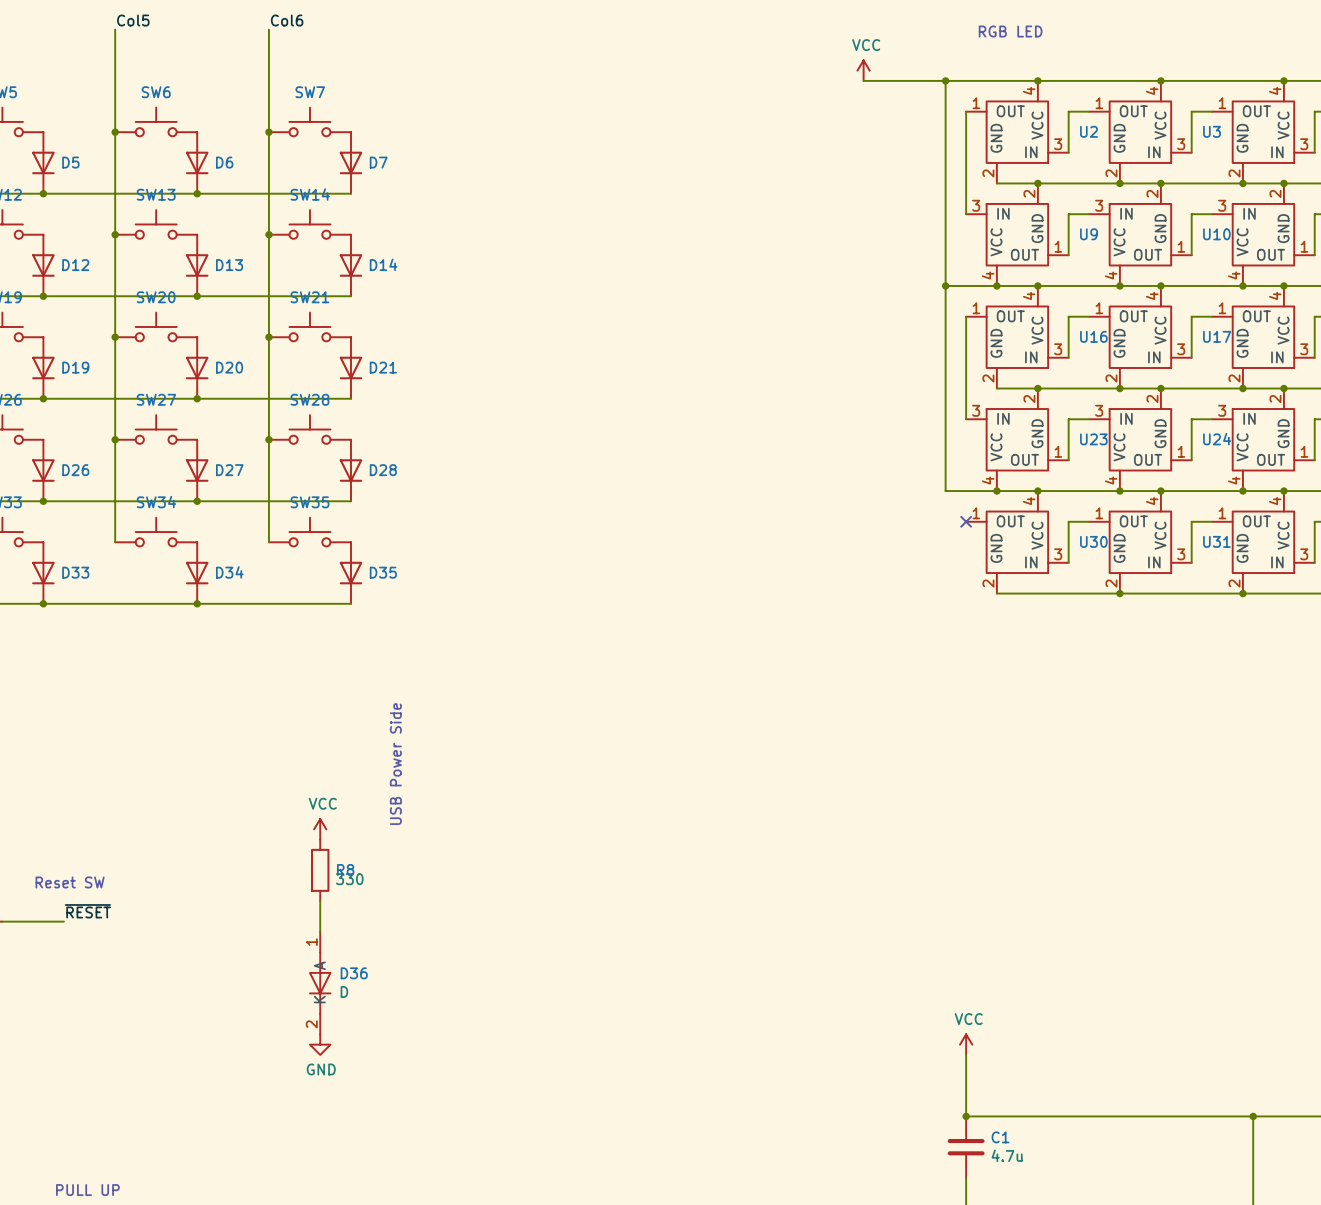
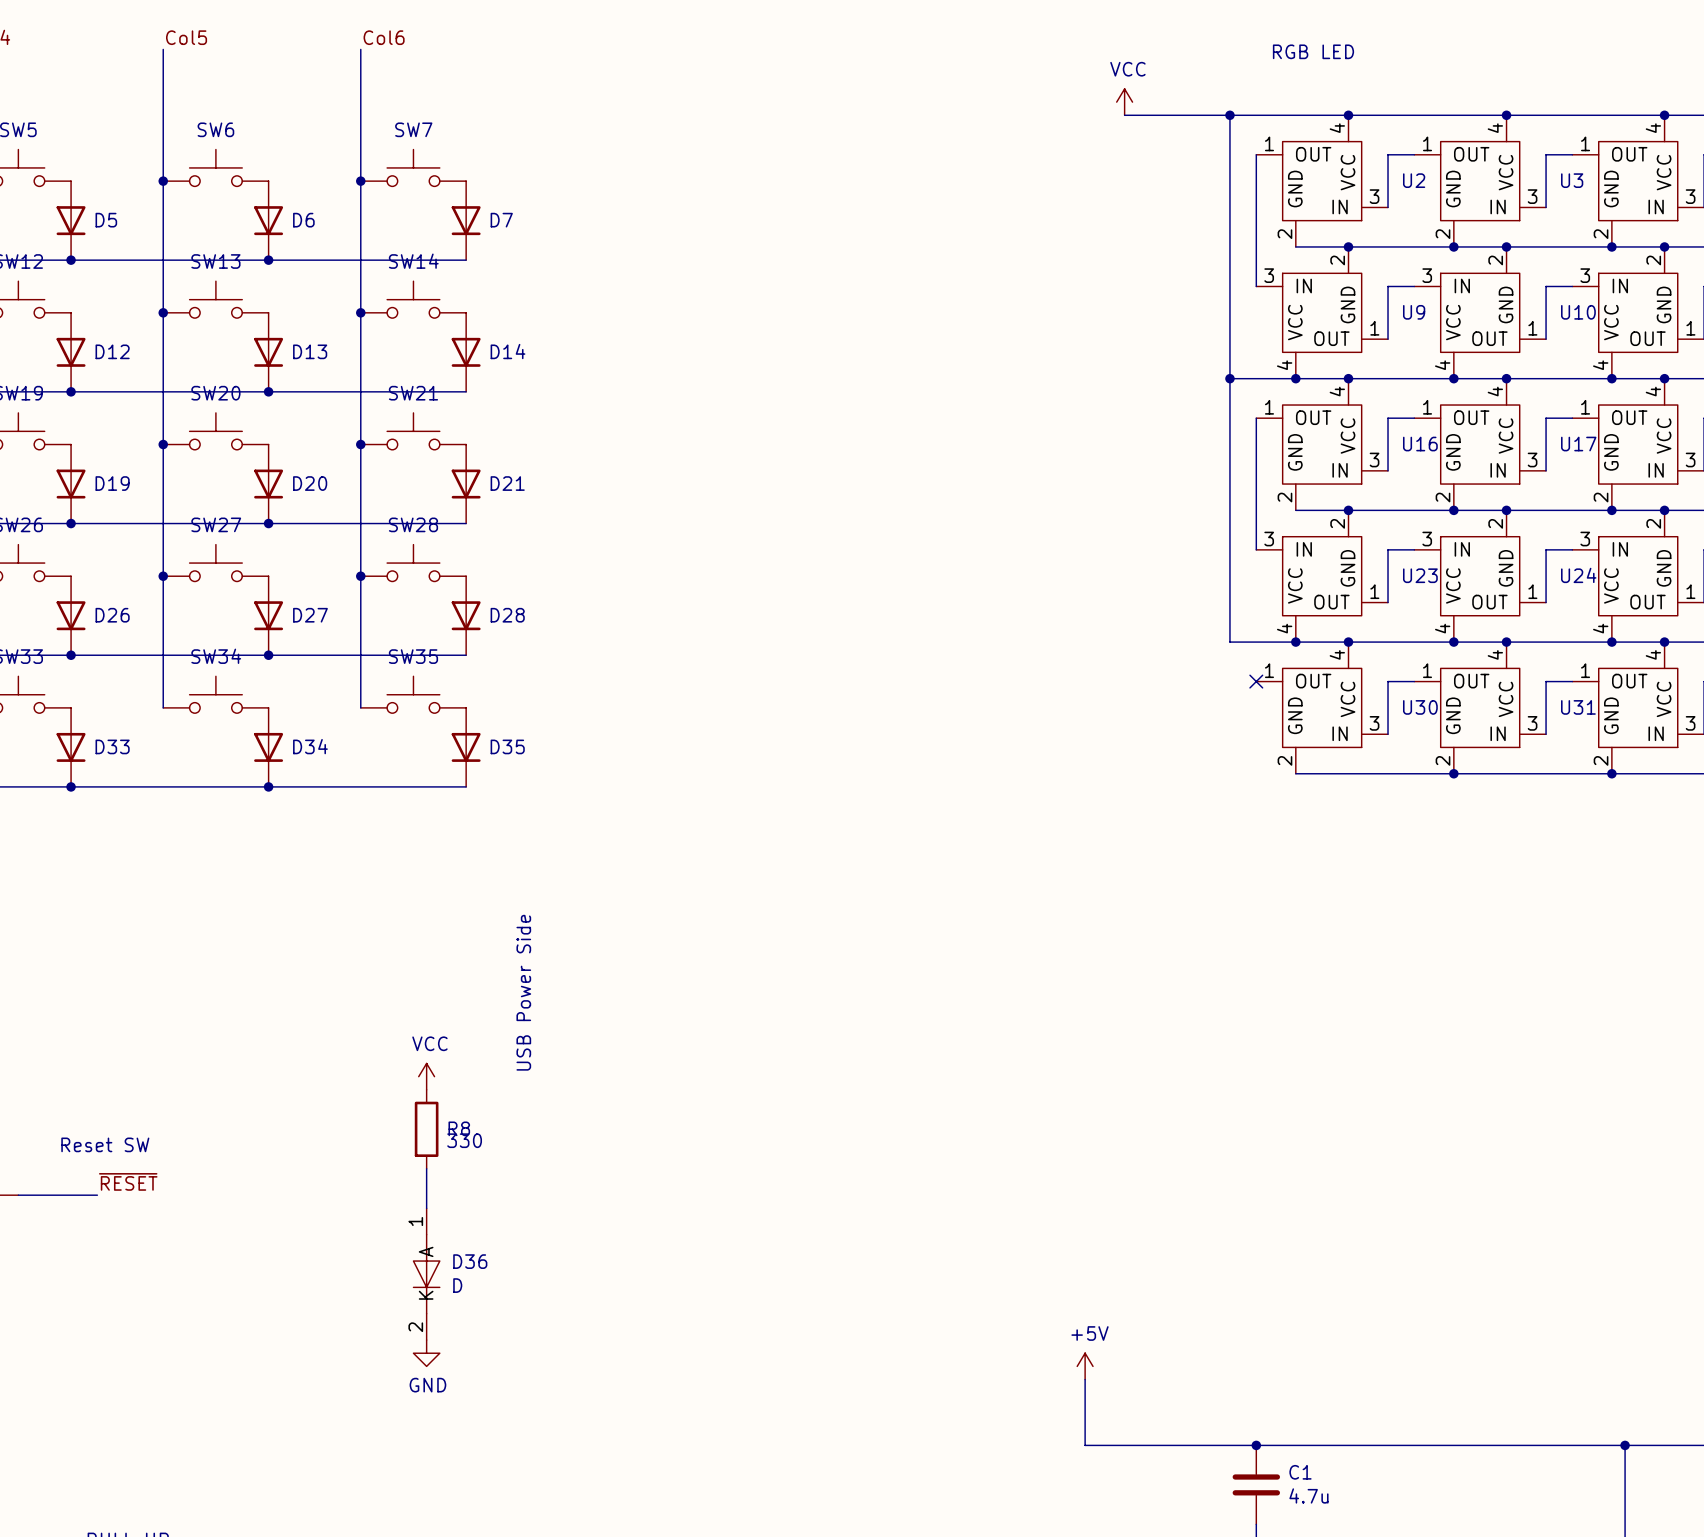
power symbol: VCC (966, 1044) -> none
power symbol: none -> +5V (1085, 1366)
wire: (966, 1054) (966, 1116) -> (1085, 1379) (1085, 1445) (1256, 1445)

